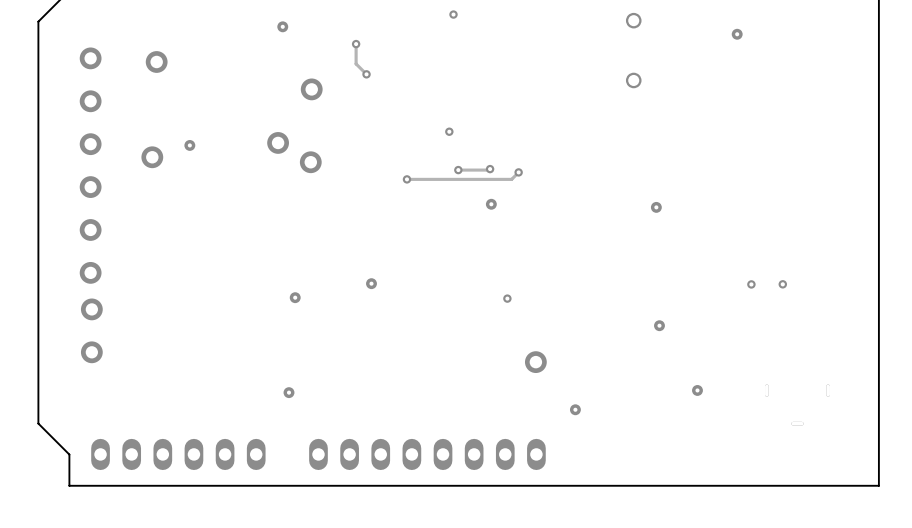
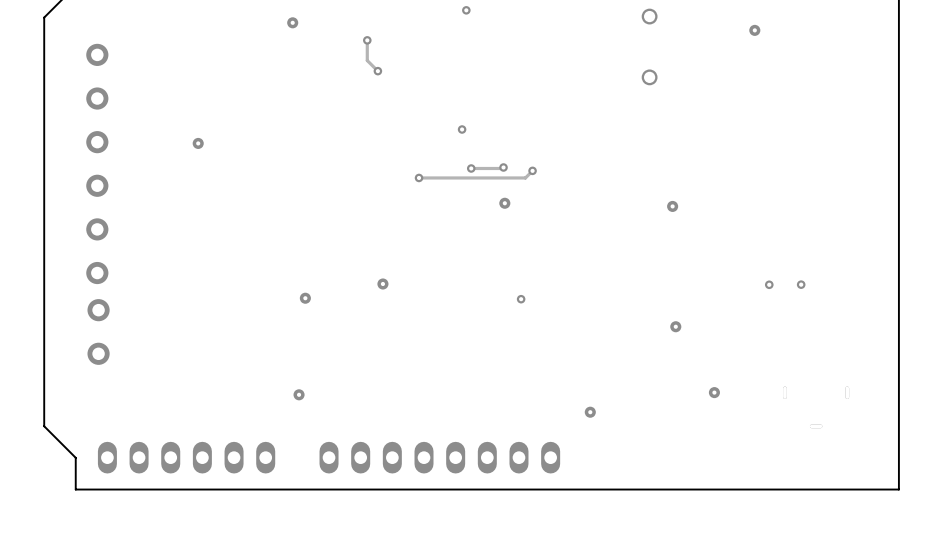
part: (156, 61) -> none
part: (311, 89) -> none
part: (278, 142) -> none
part: (152, 157) -> none
part: (310, 162) -> none
part: (535, 362) -> none

